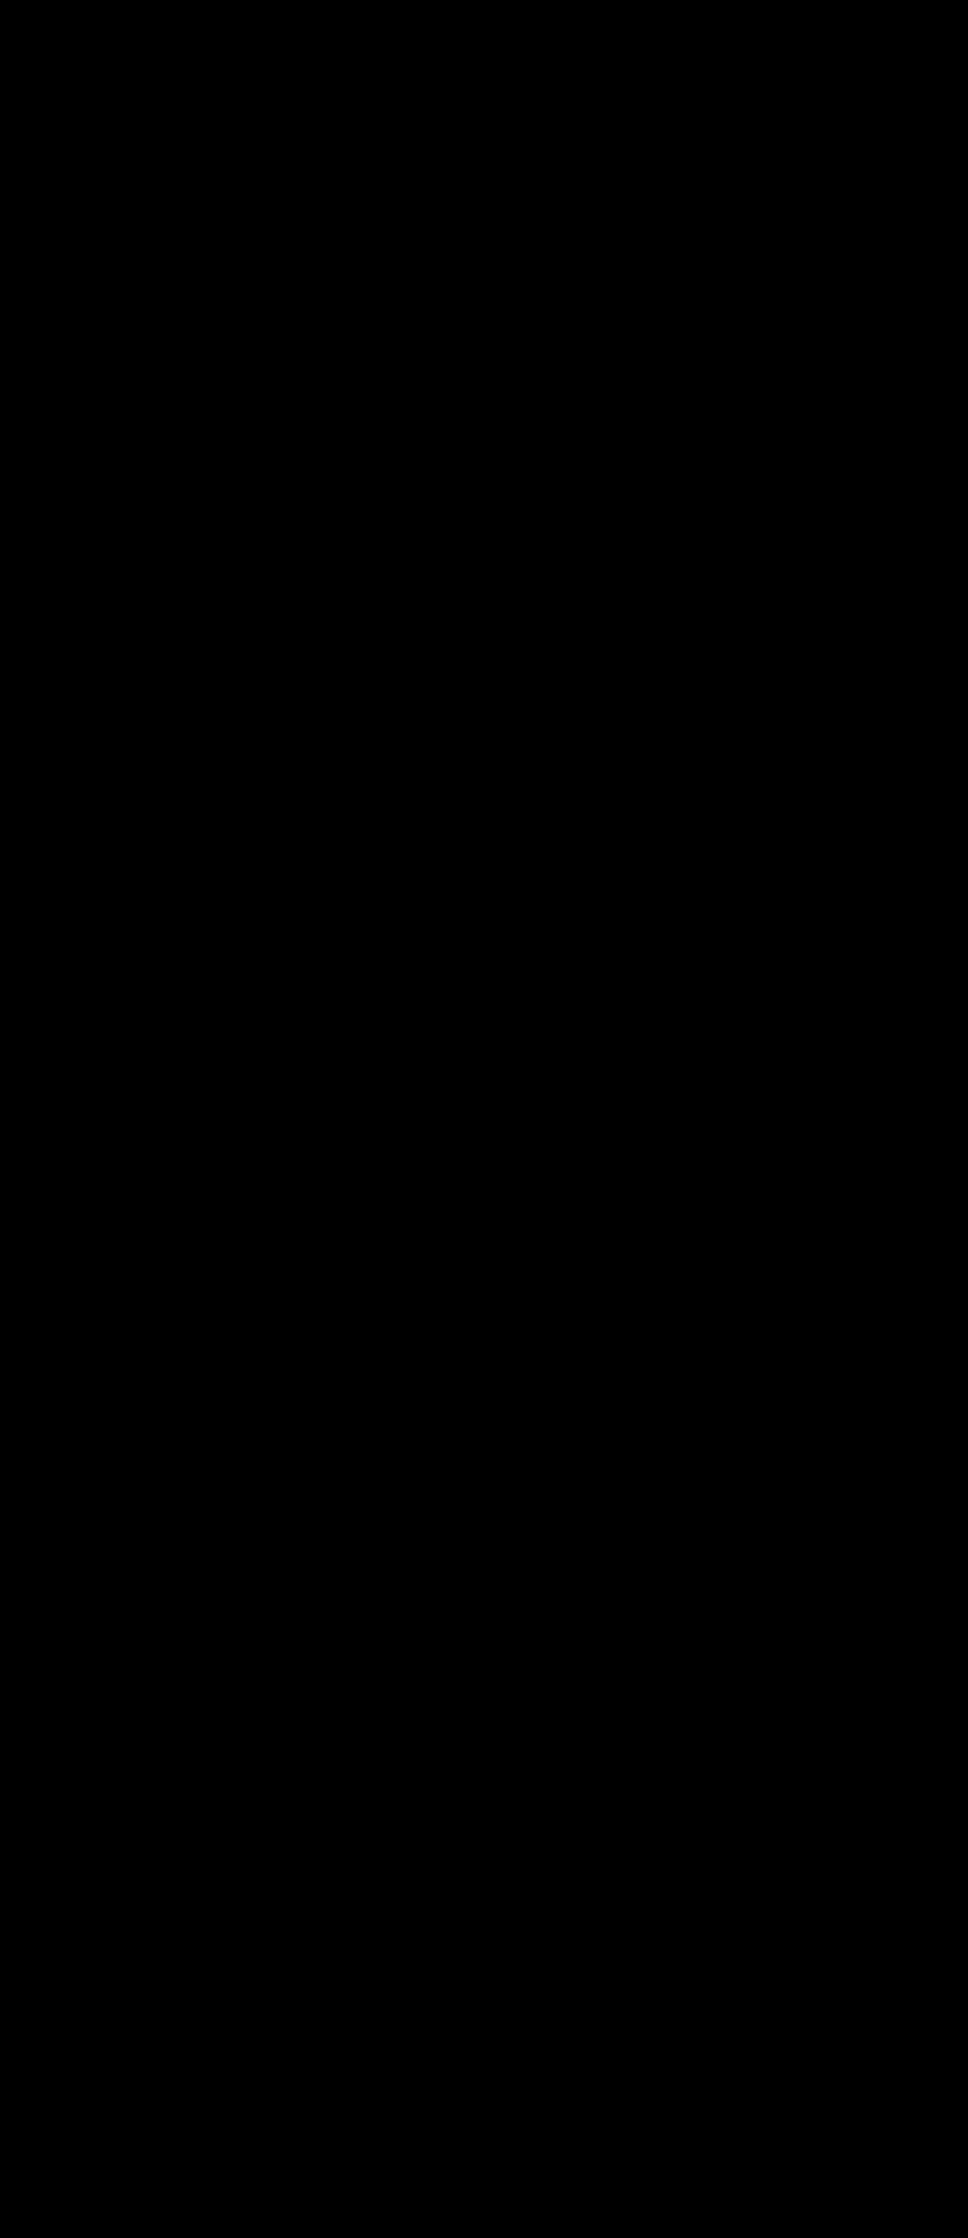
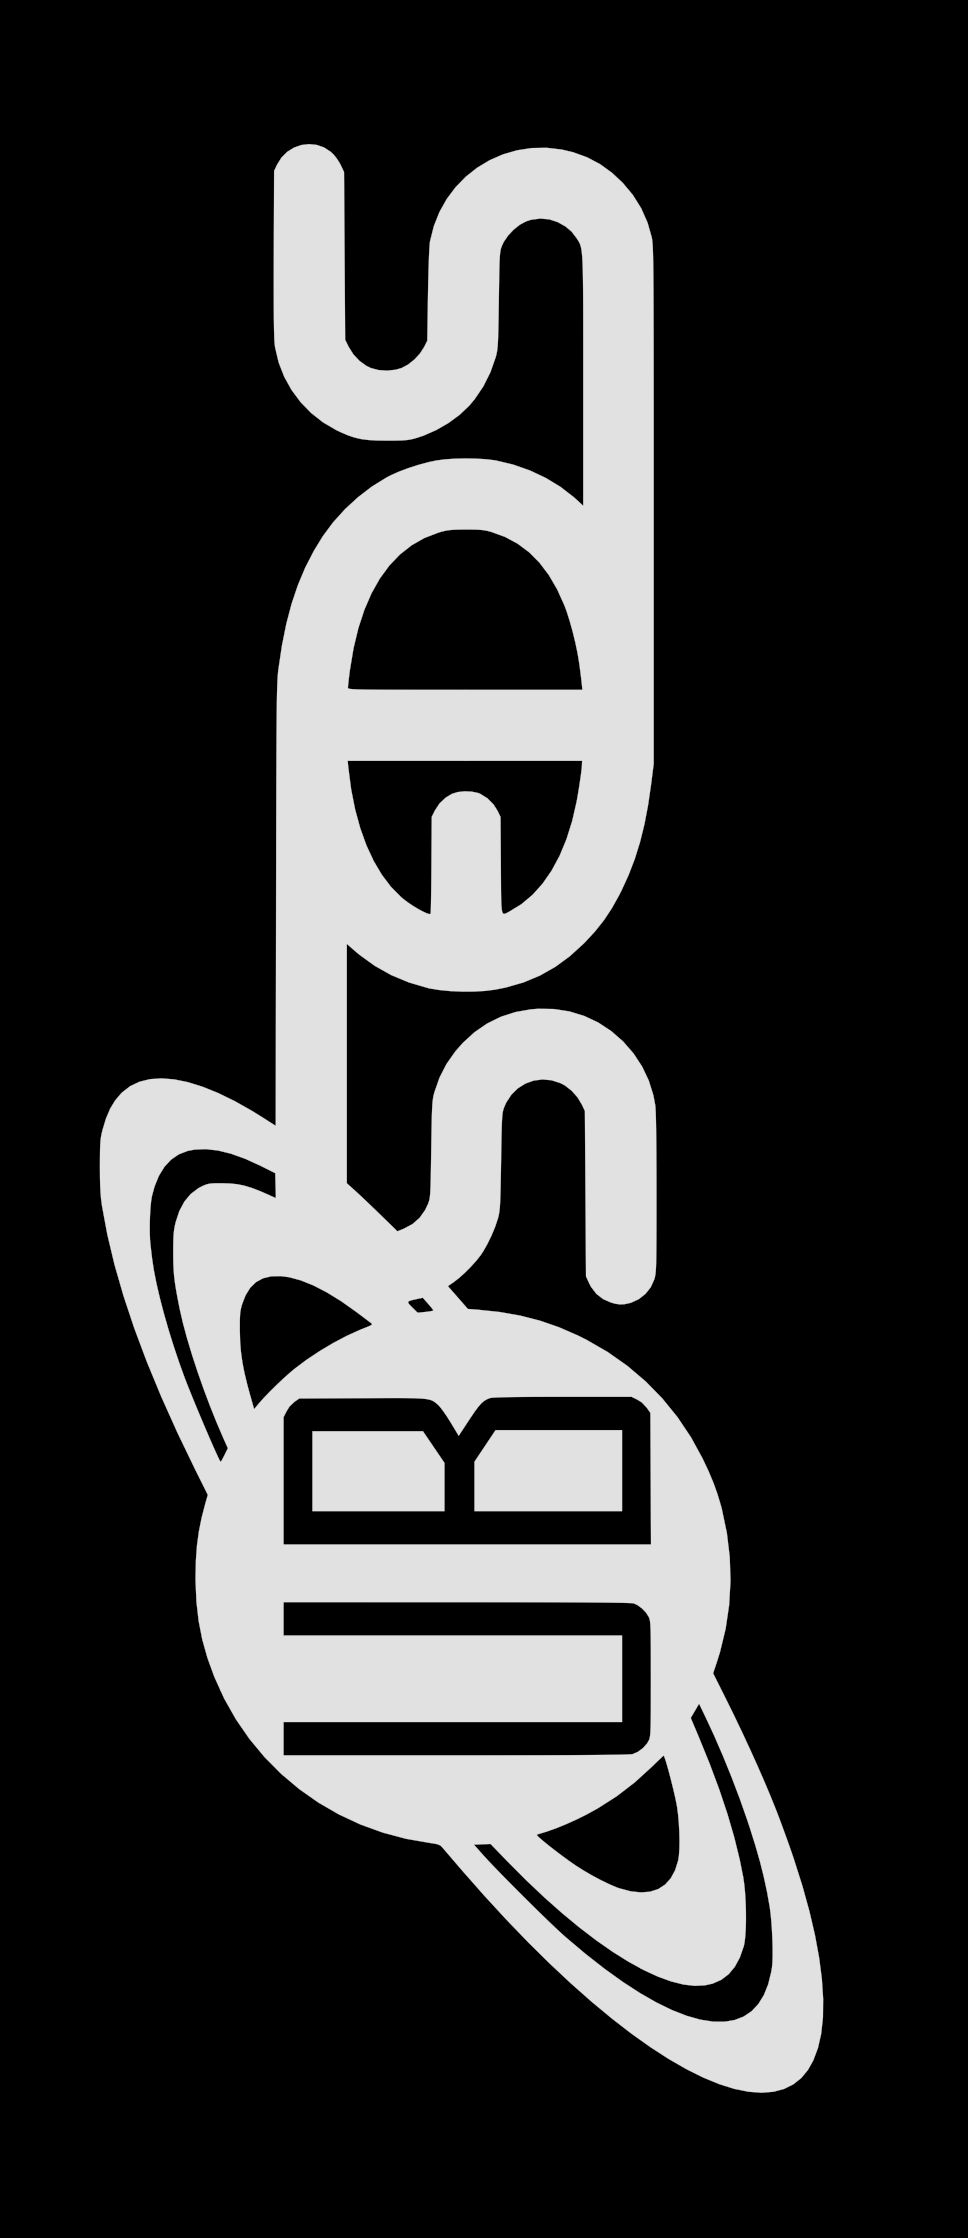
drawing: none -> [99, 143, 824, 2093]

